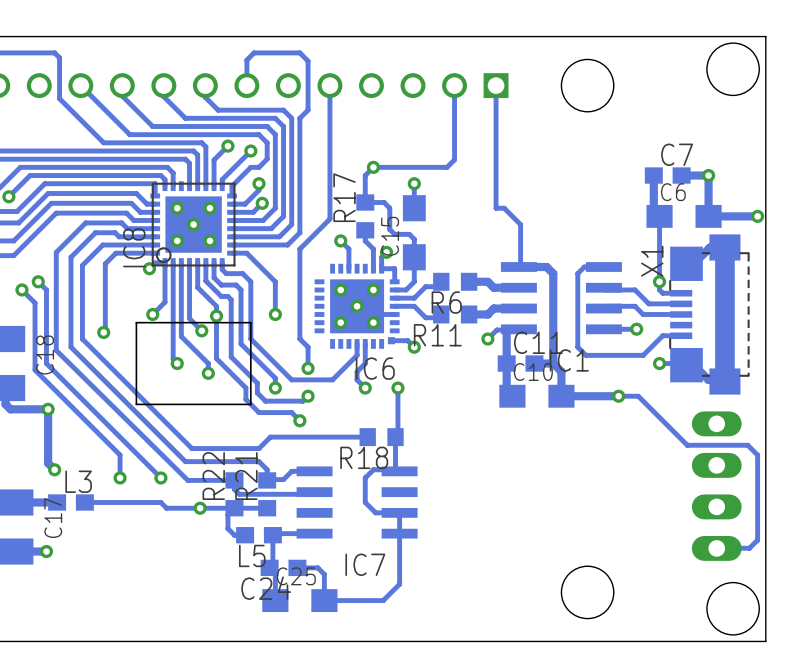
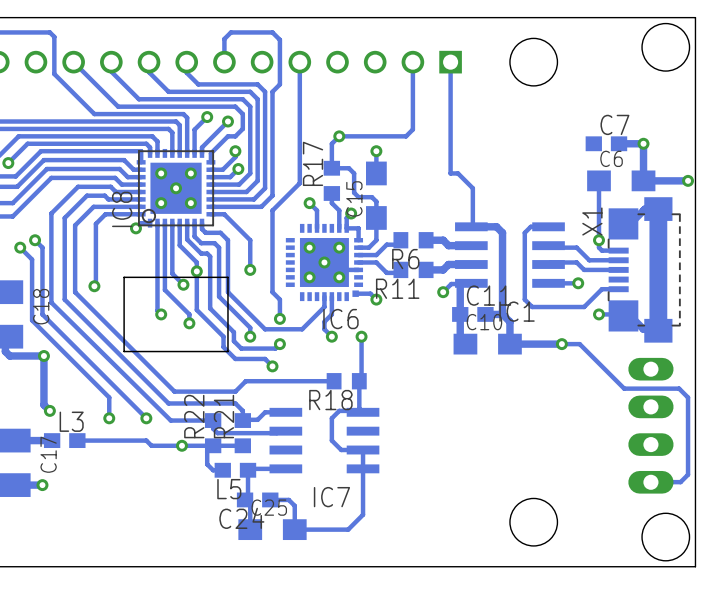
track: (653, 175) (653, 210) (659, 216) -> none
track: (165, 262) (165, 302) (152, 314) -> none
via: (152, 314) -> none

